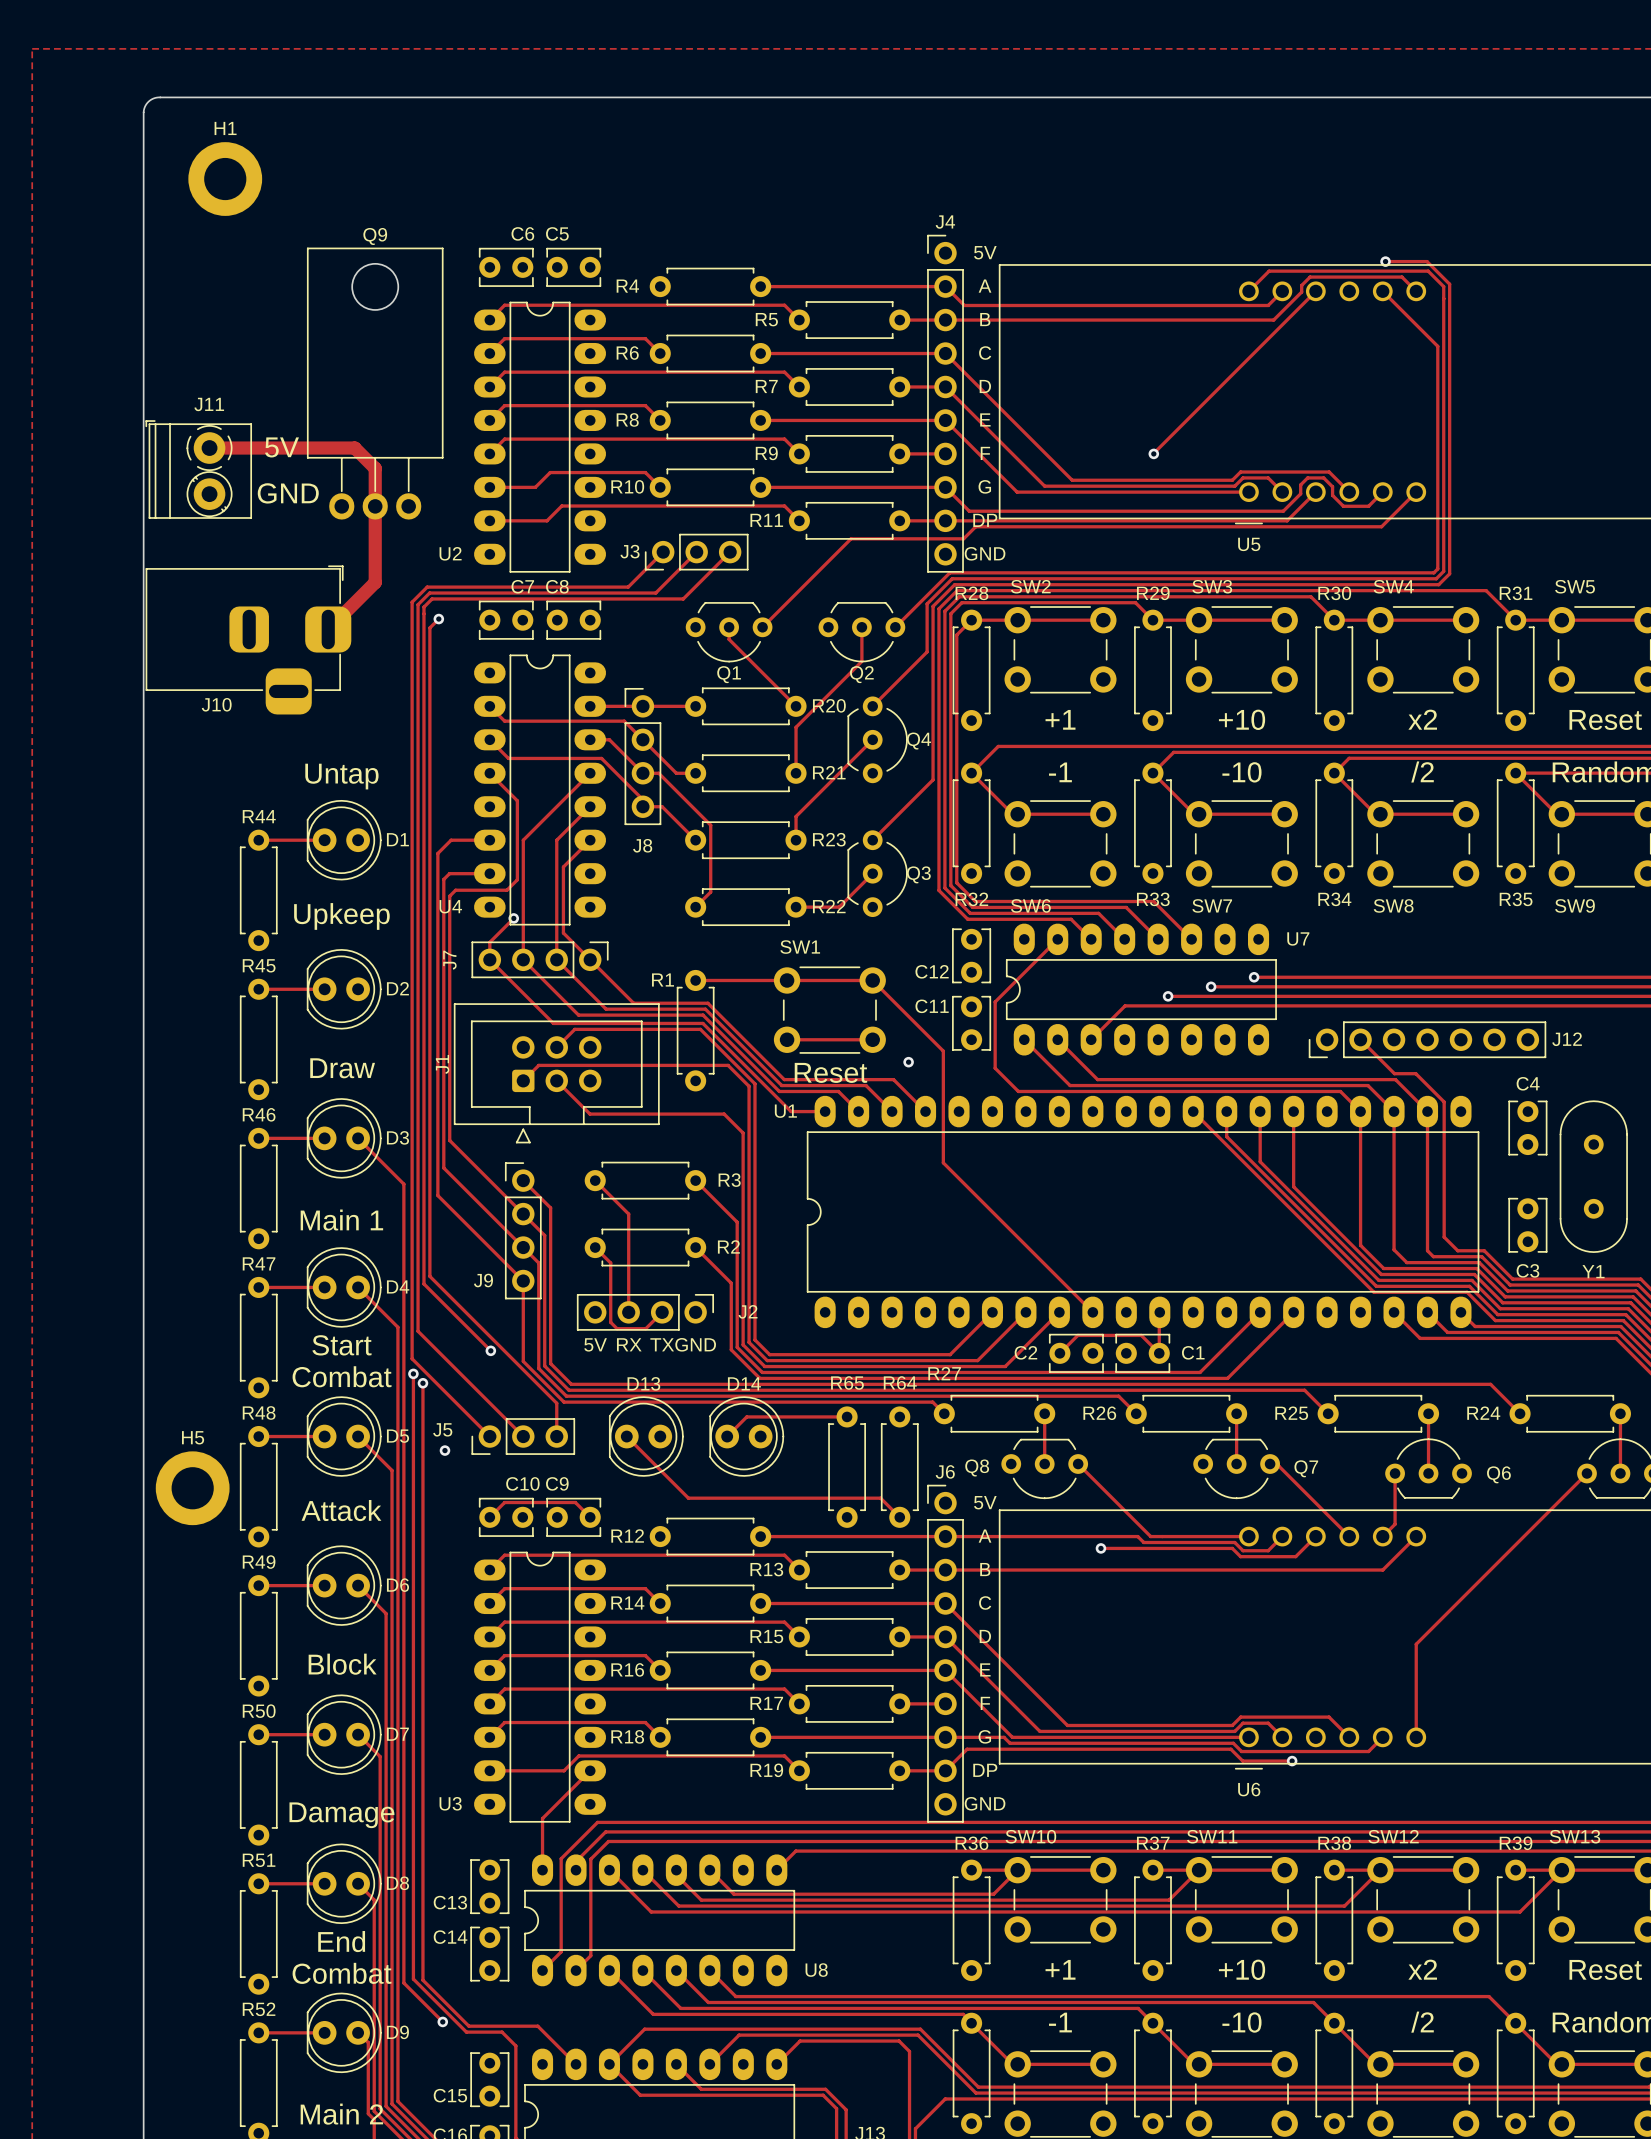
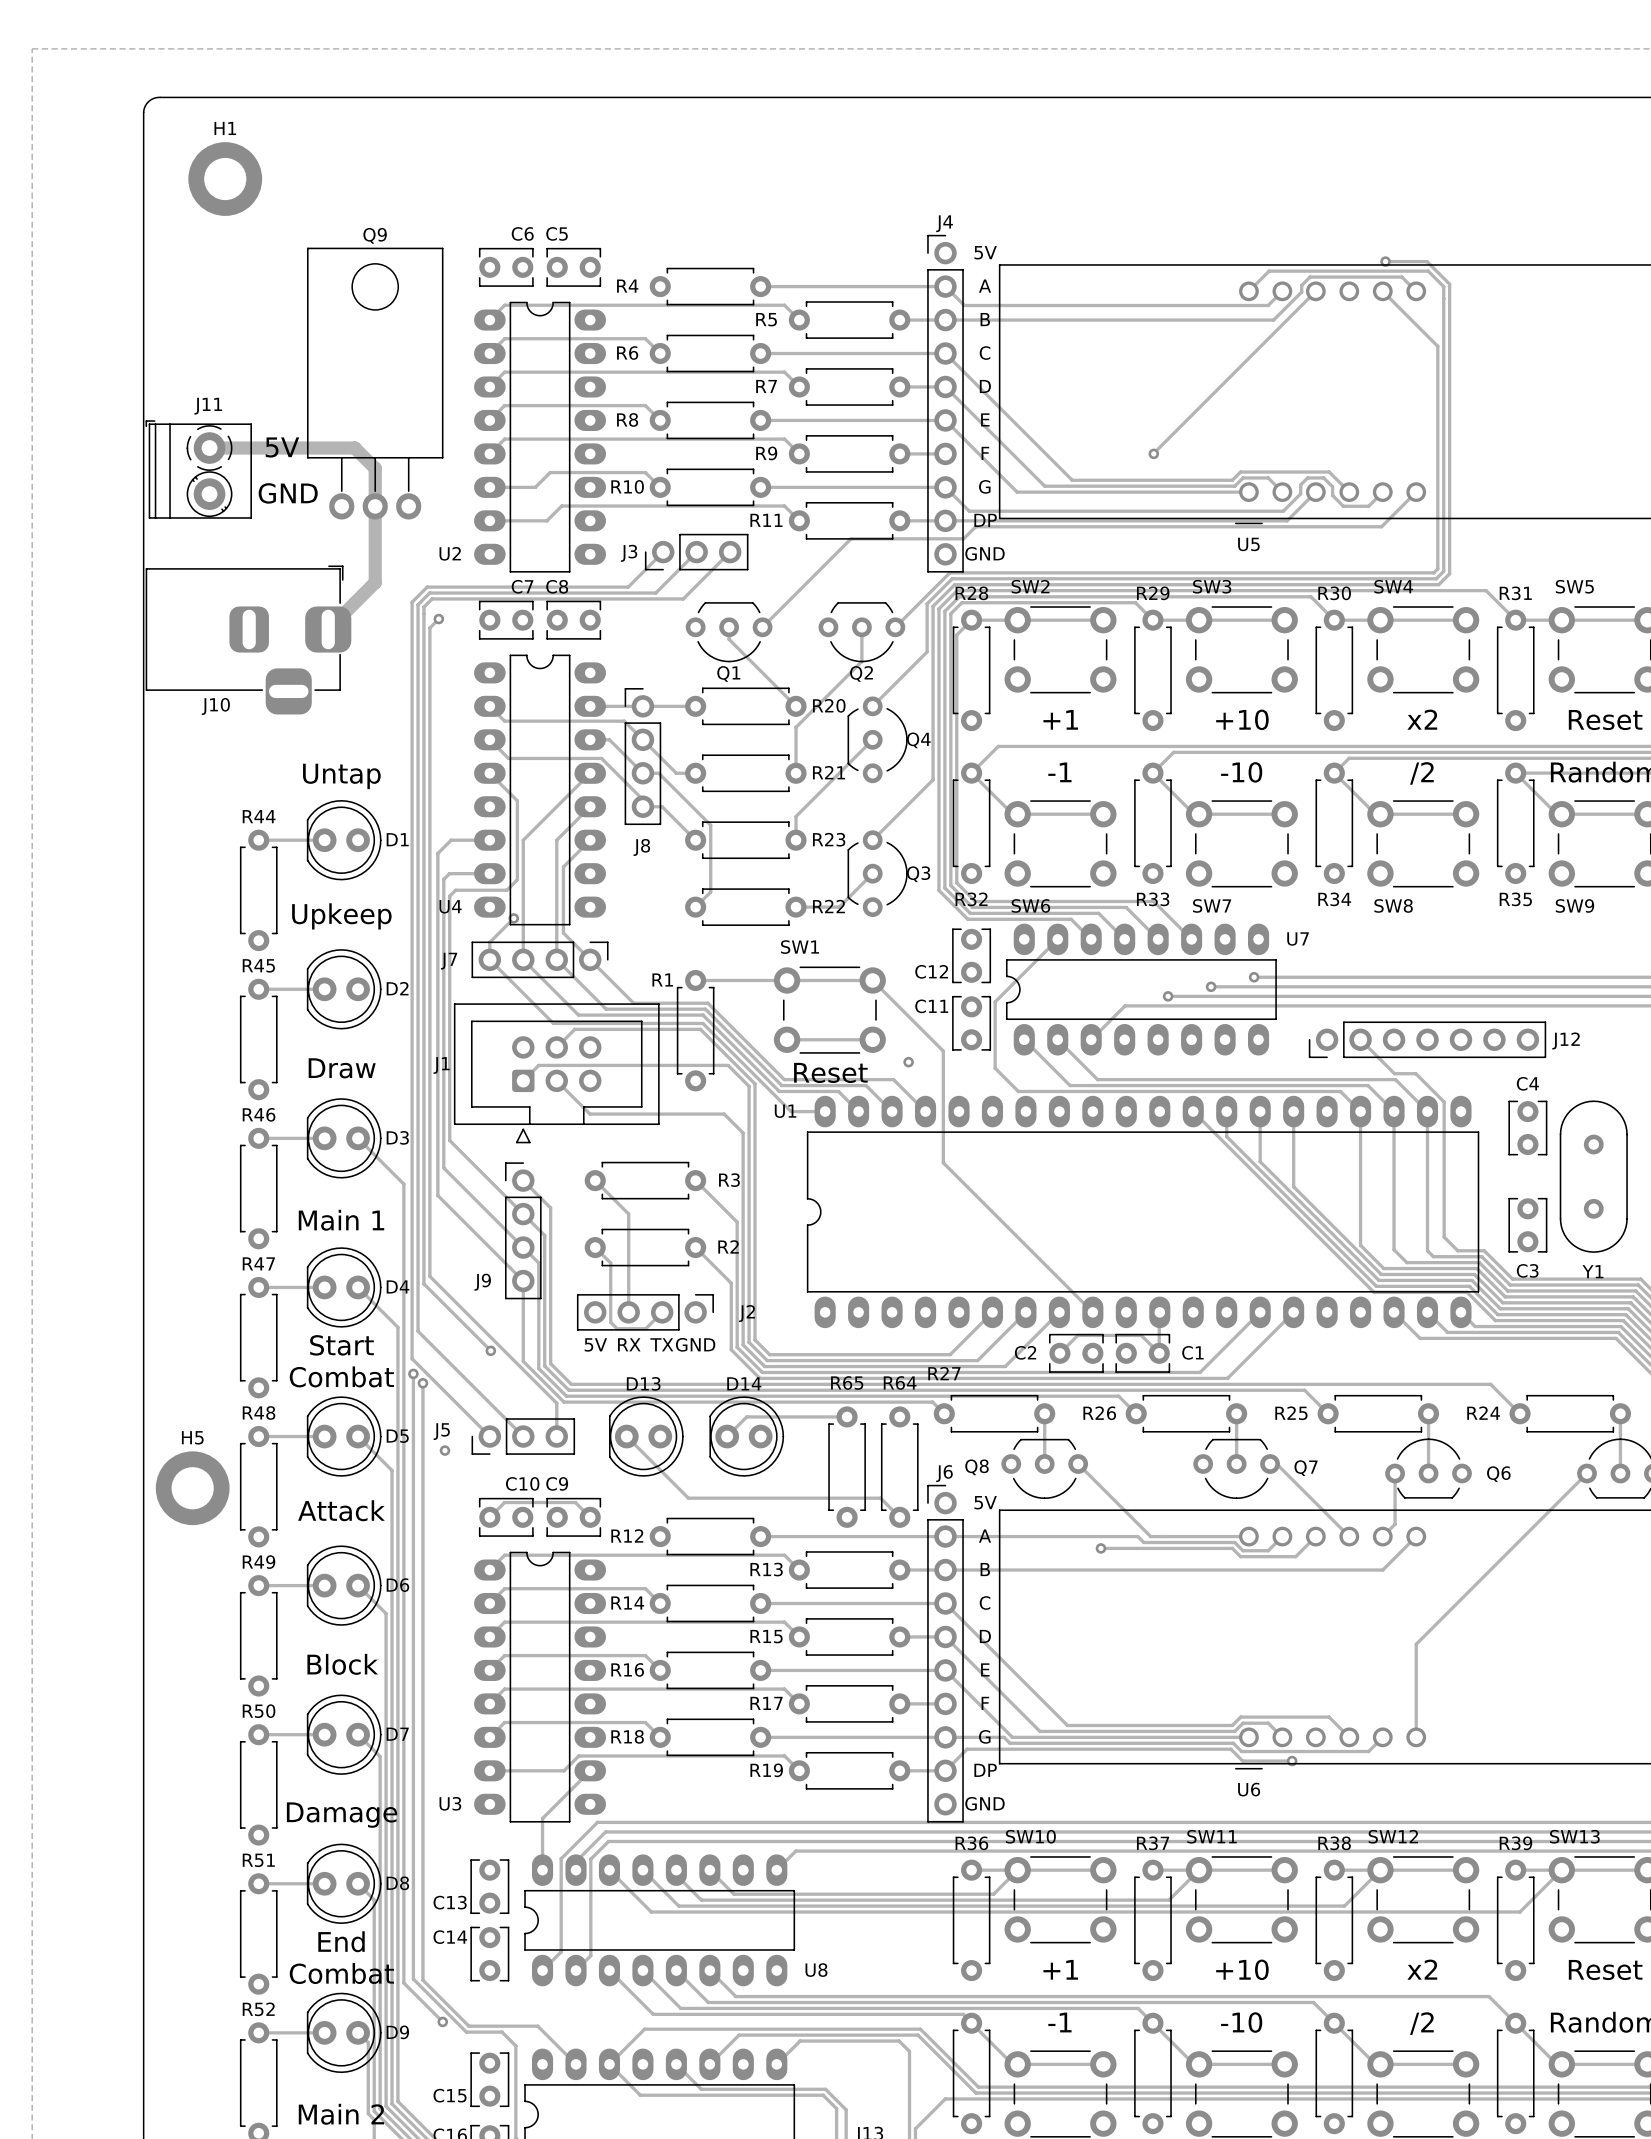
J7 name rotation: 0° (449, 960) -> 90° clockwise (449, 961)
J1 name rotation: 0° (442, 1064) -> 90° clockwise (441, 1065)

